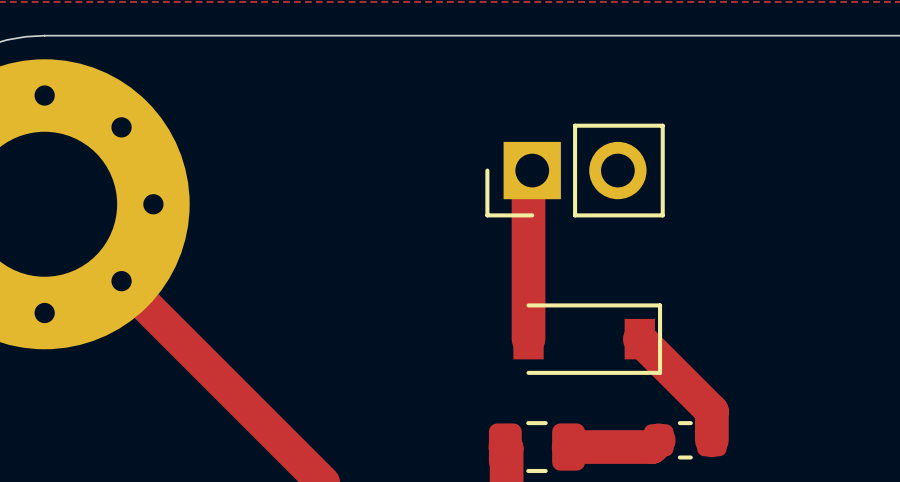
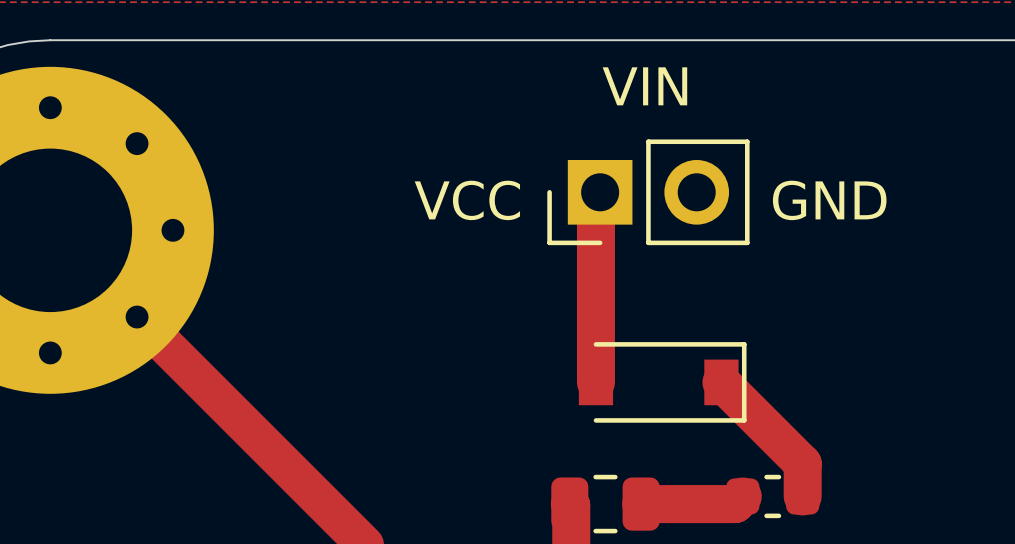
text: none -> VIN (644, 86)
text: none -> VCC (467, 200)
text: none -> GND (829, 200)

